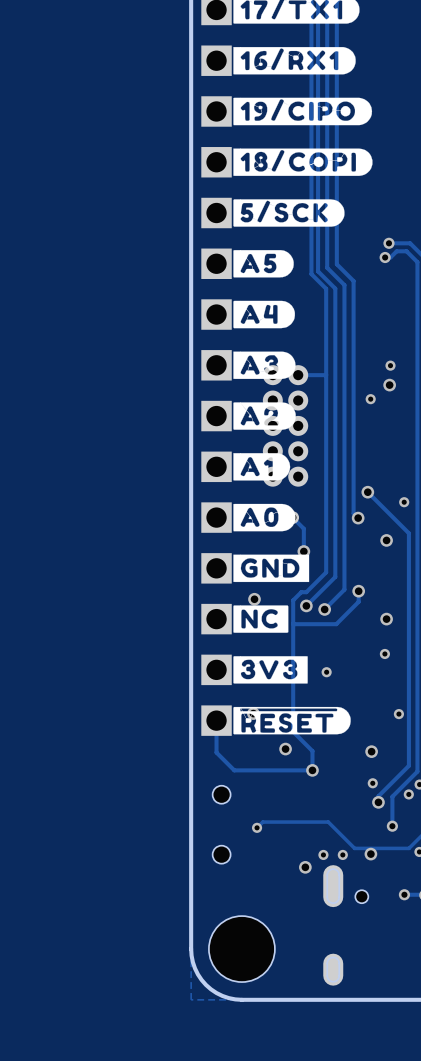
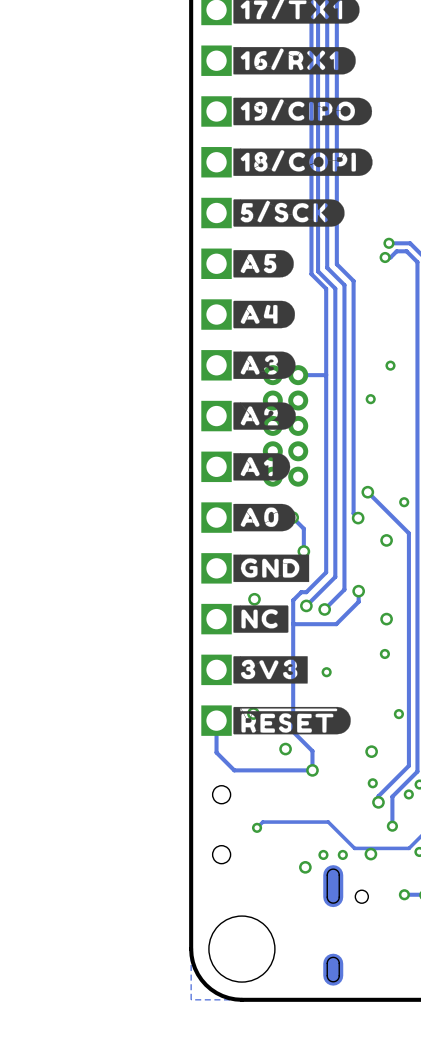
via: (389, 385) -> none

